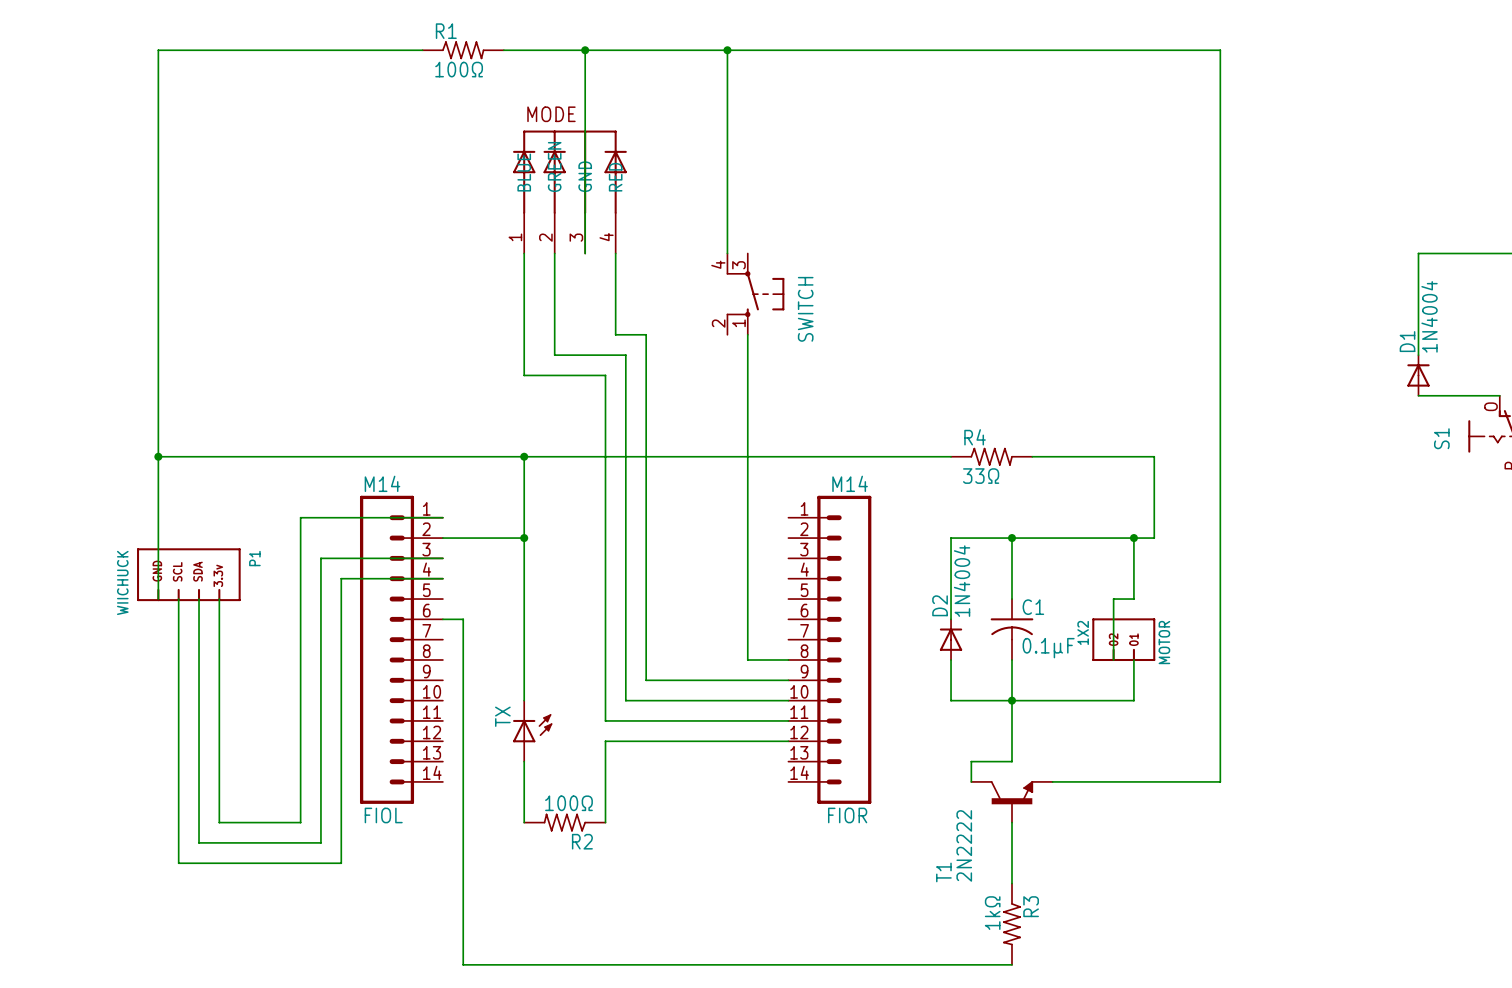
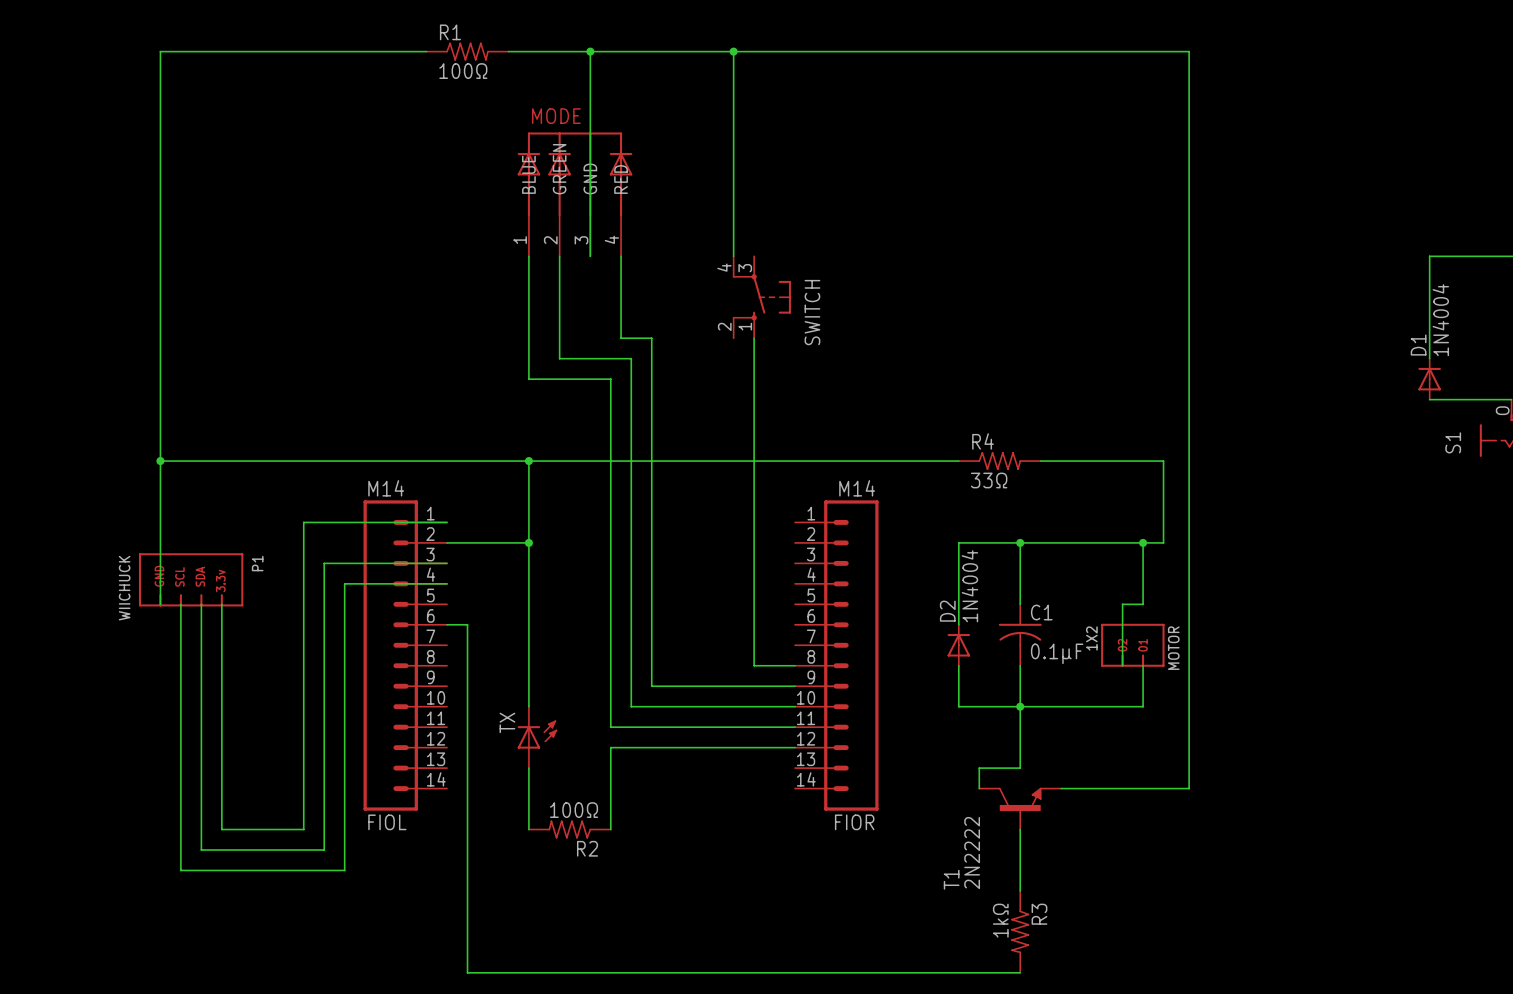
wire: (1179, 50) (1220, 50) (1220, 781) (1179, 781) -> (1189, 51) (1189, 788)

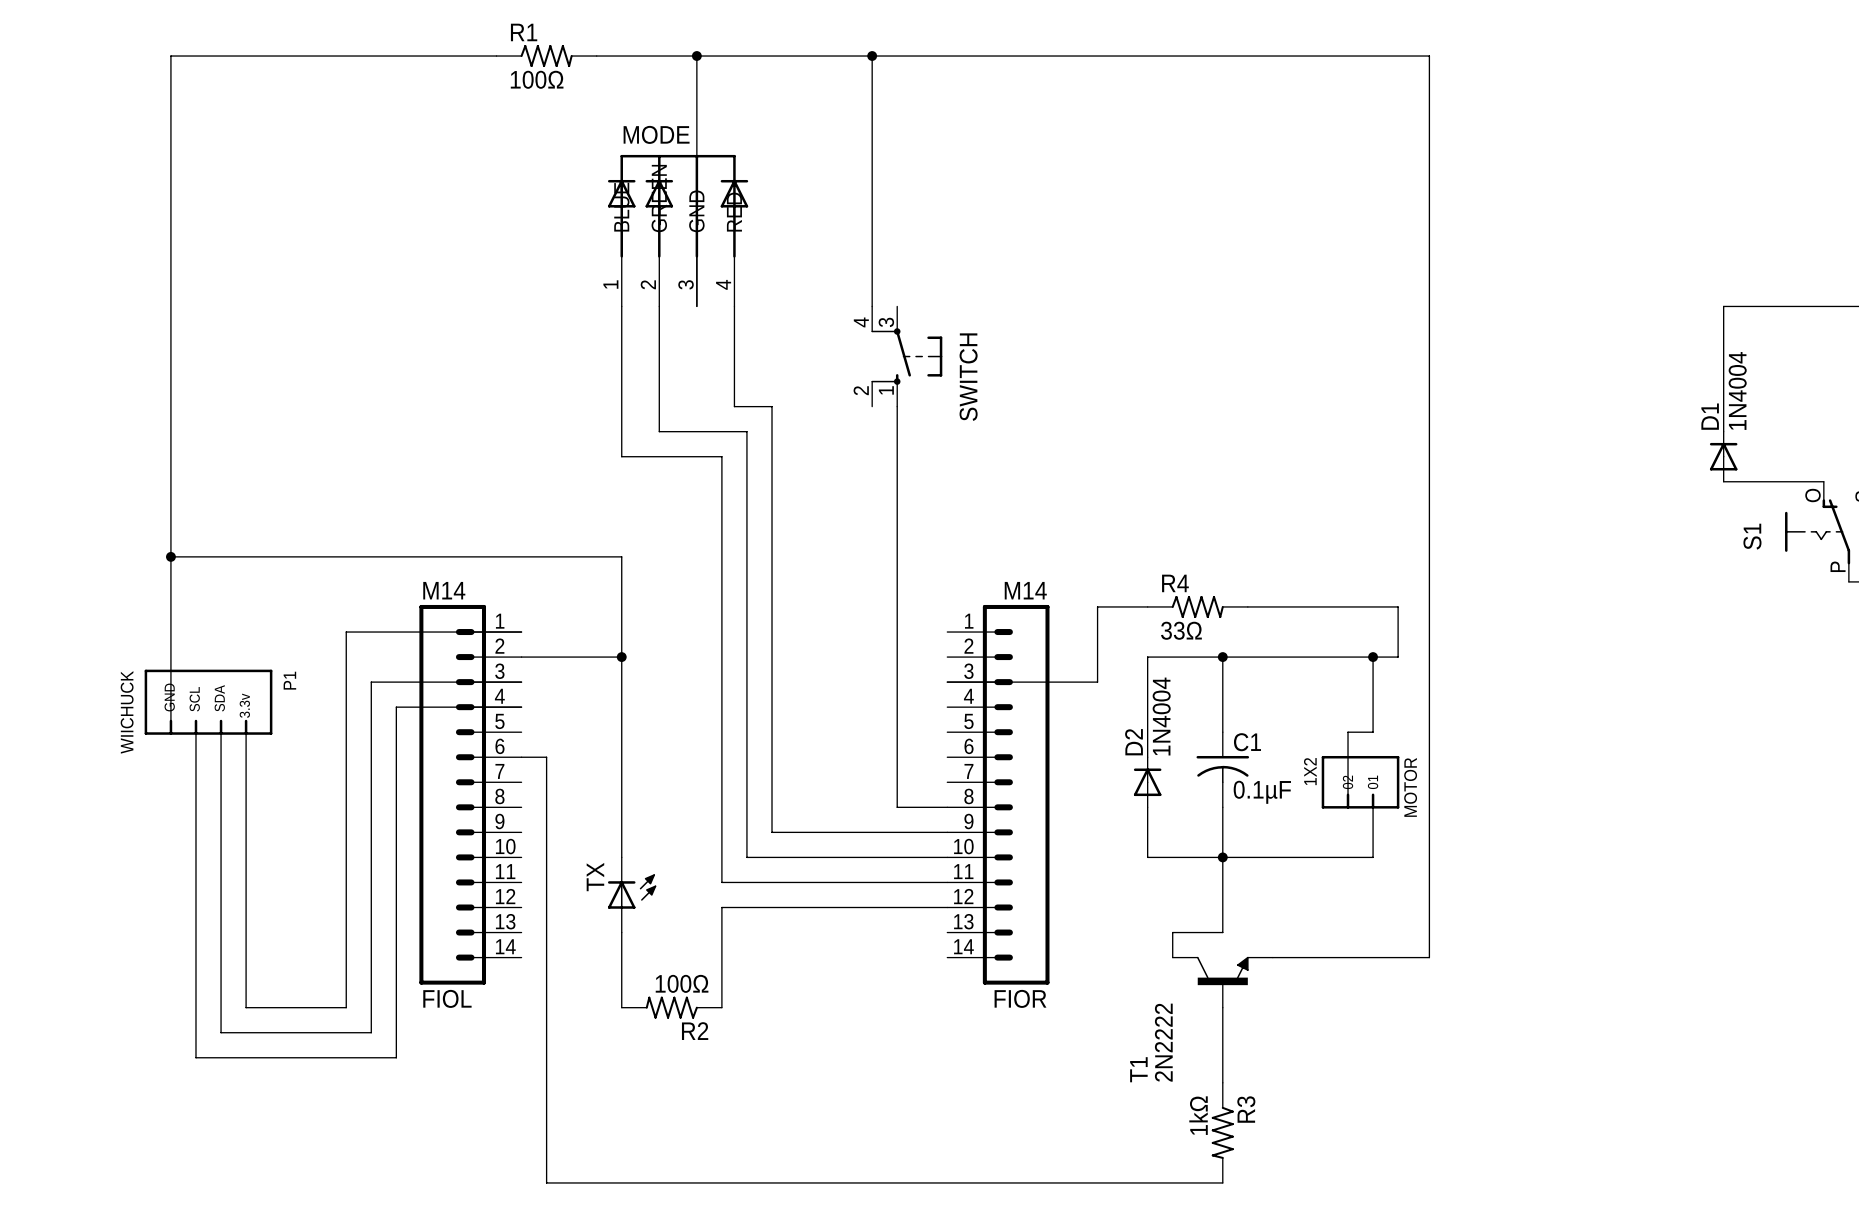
wire: (528, 461) (958, 461) -> none
junction: (528, 461) -> none
R4 position: (999, 461) -> (1197, 606)
wire: (1040, 461) (1163, 461) (1163, 501) -> (1247, 606) (1398, 606)
wire: none -> (1147, 606) (1097, 606) (1097, 682) (947, 682)

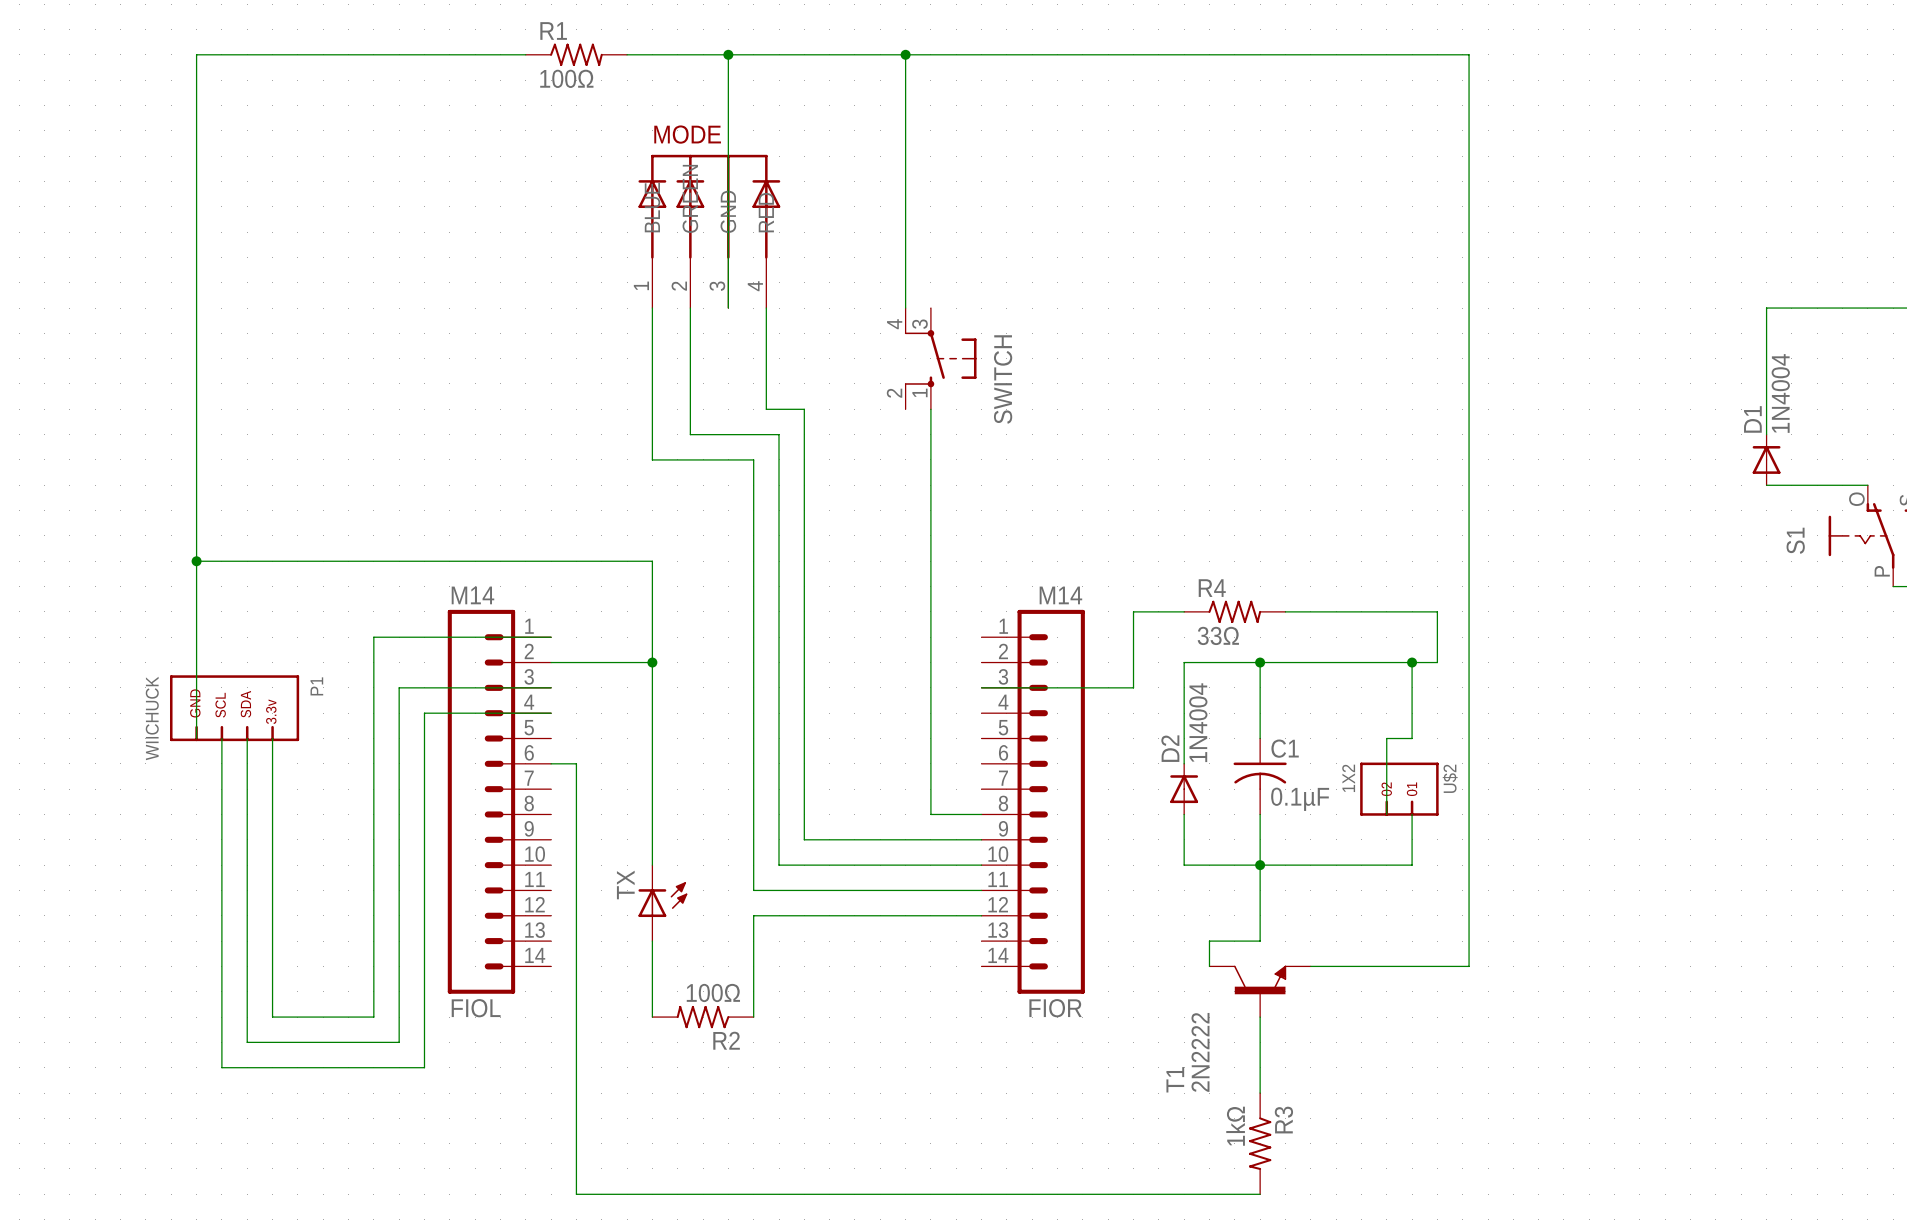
MOTOR name: MOTOR (1410, 787) -> U$2 (1450, 778)

